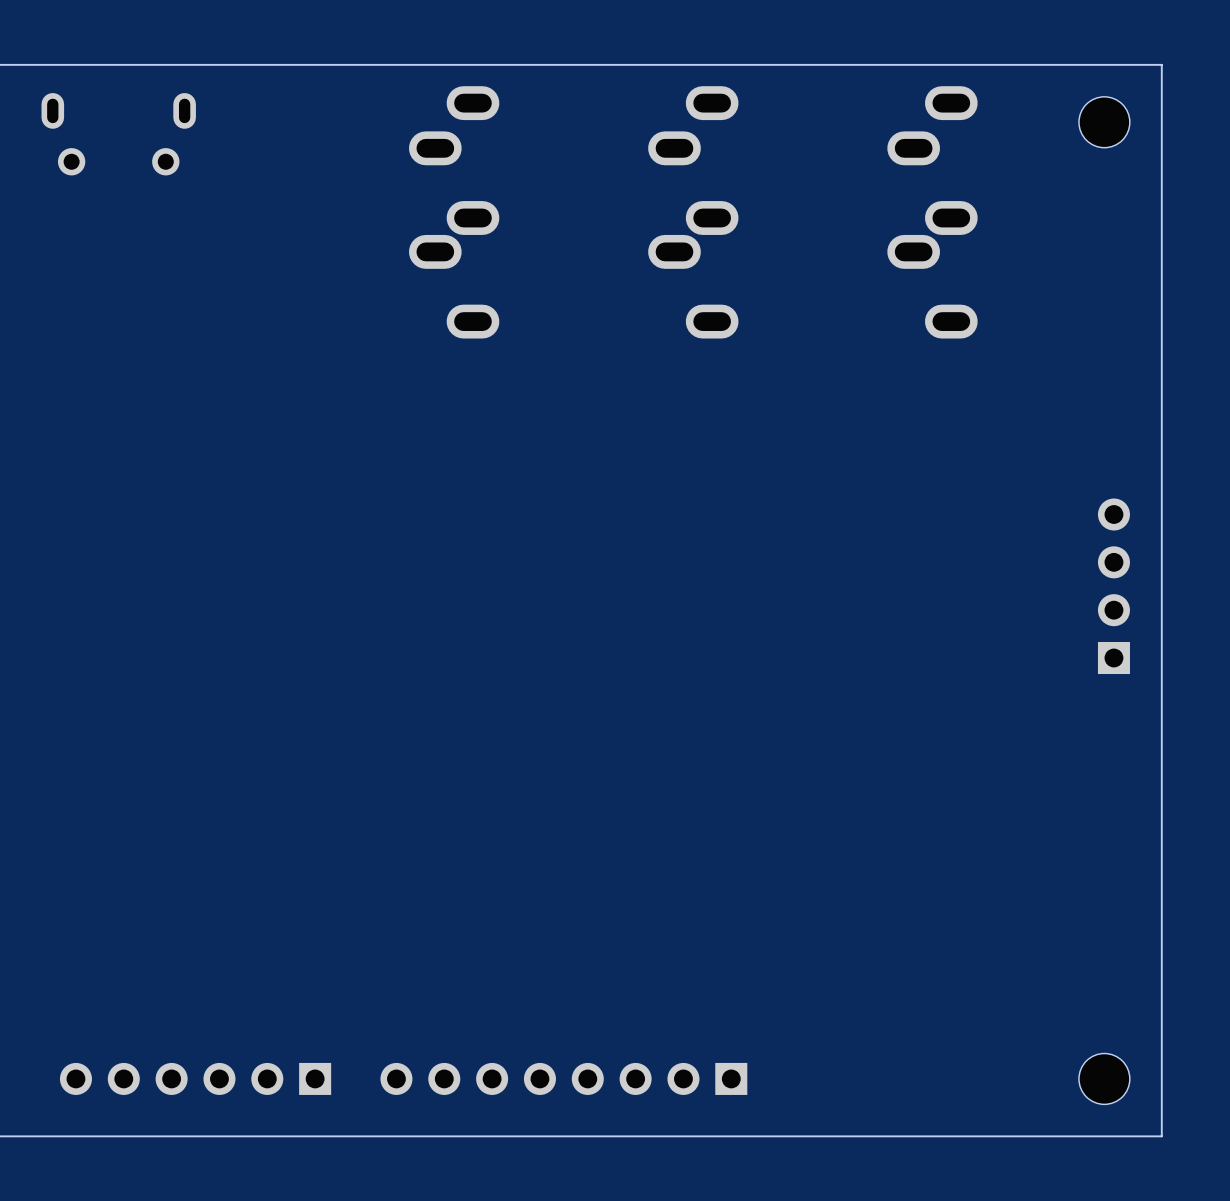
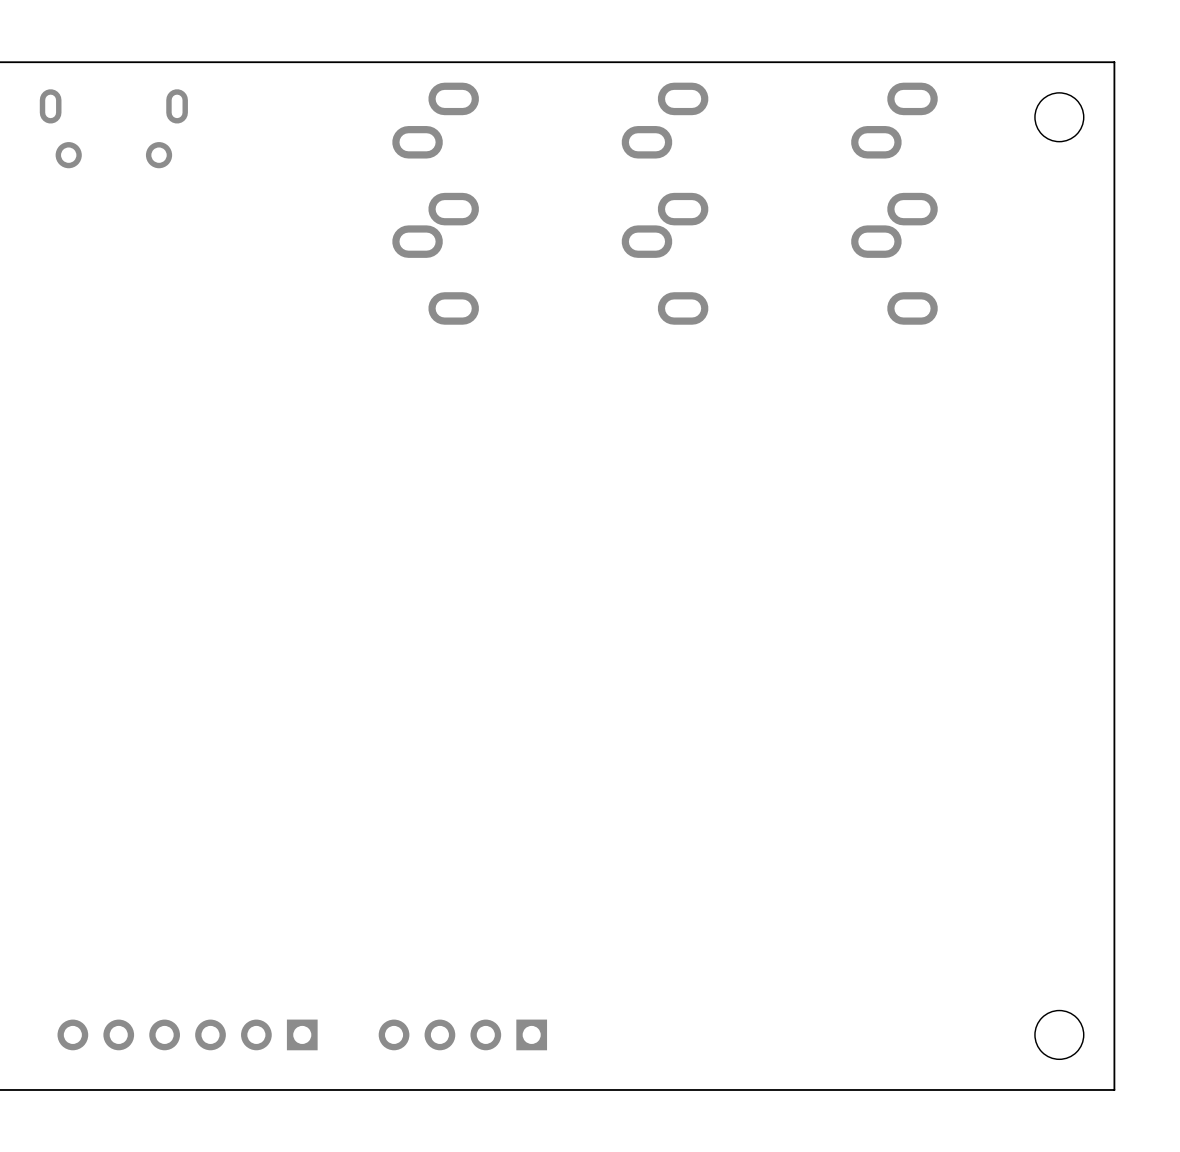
part: (1113, 586) -> none
part: none -> (462, 1034)
part: (563, 1078) -> none

